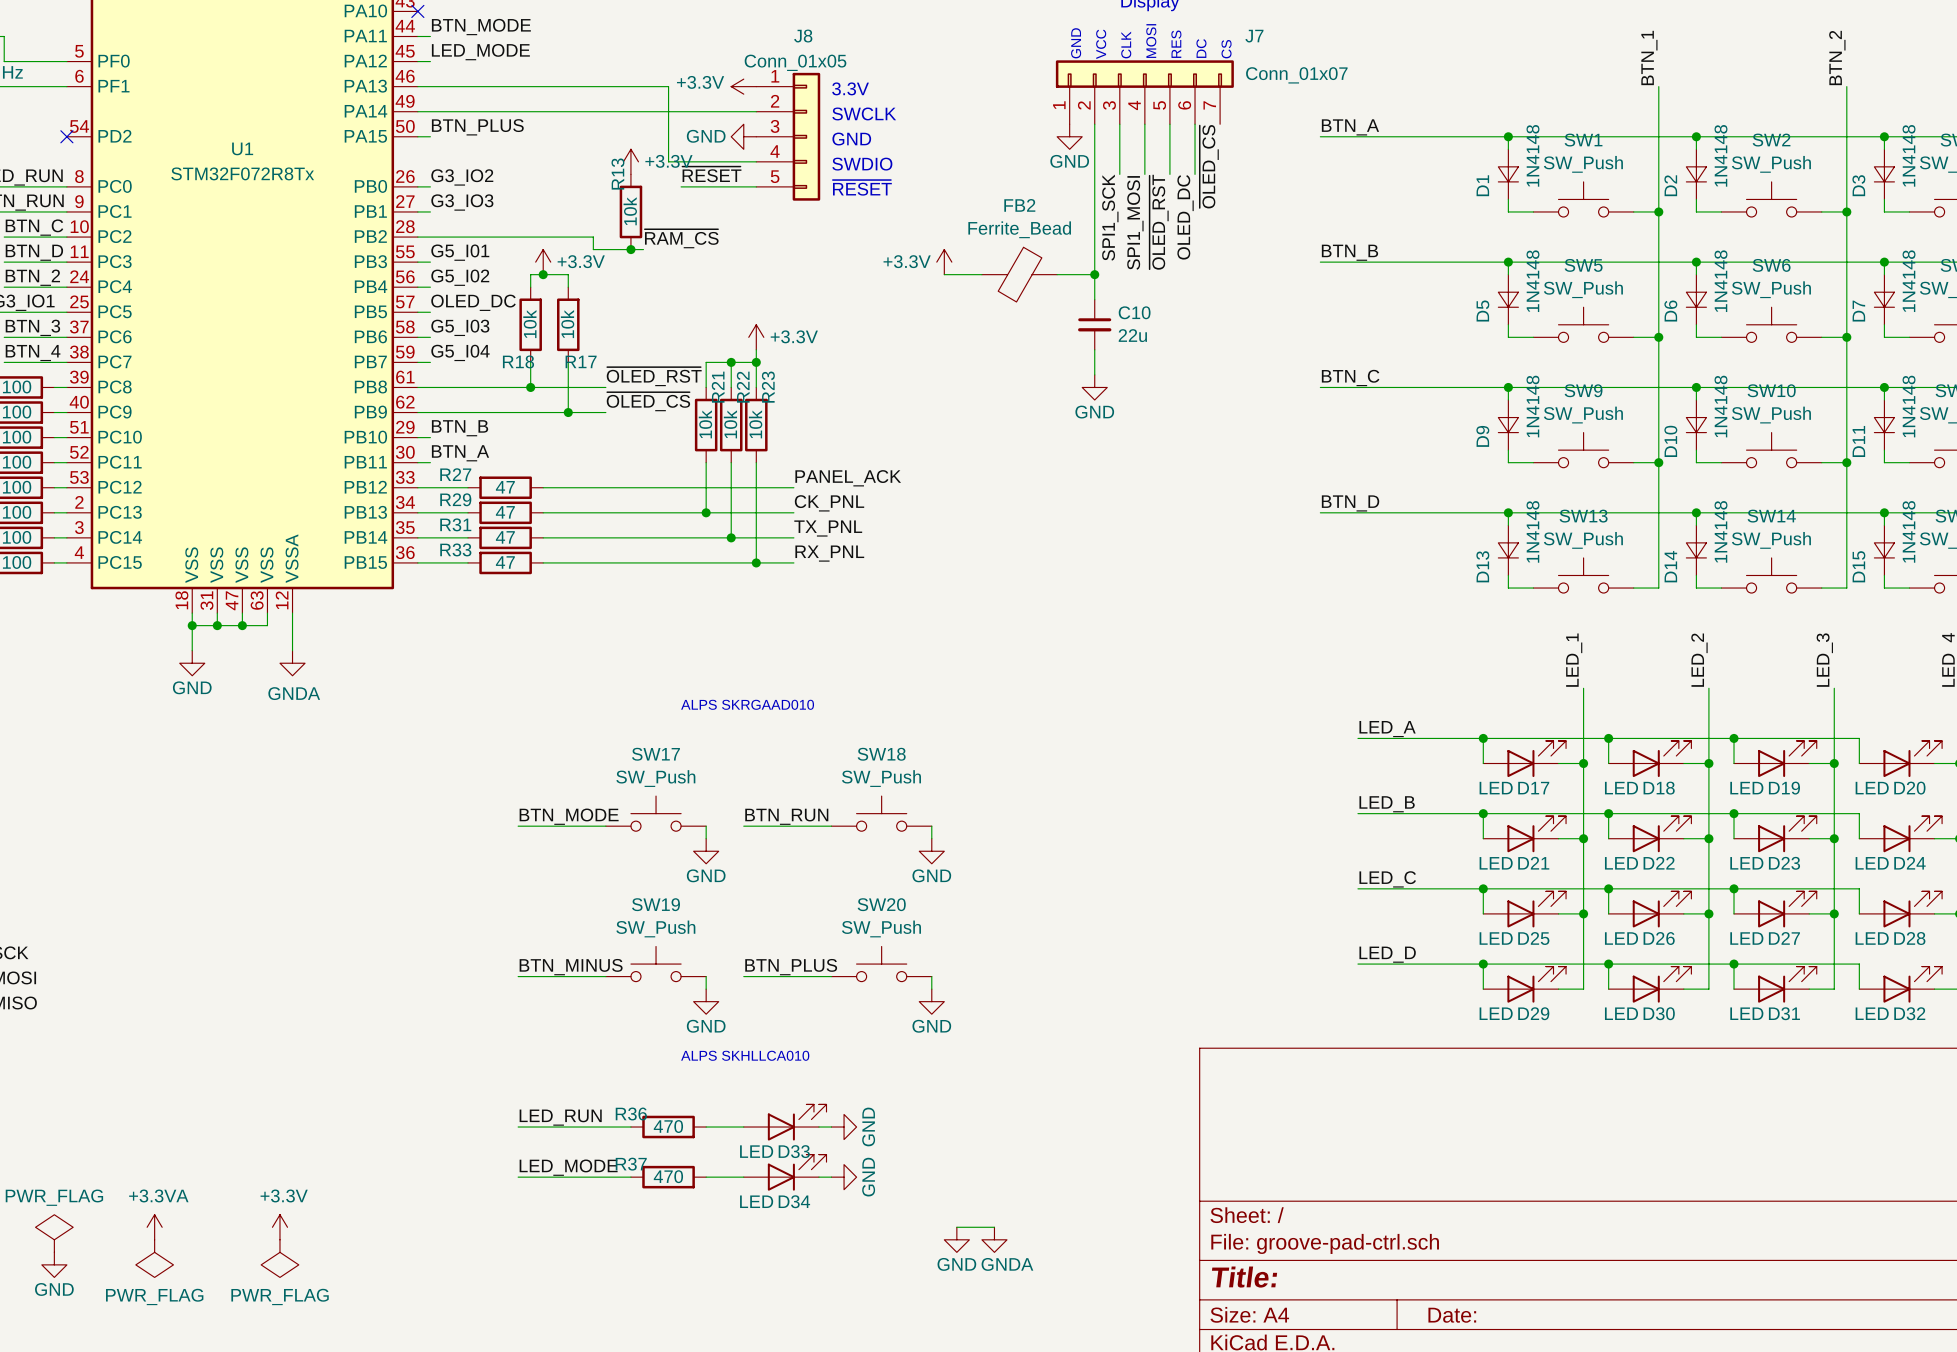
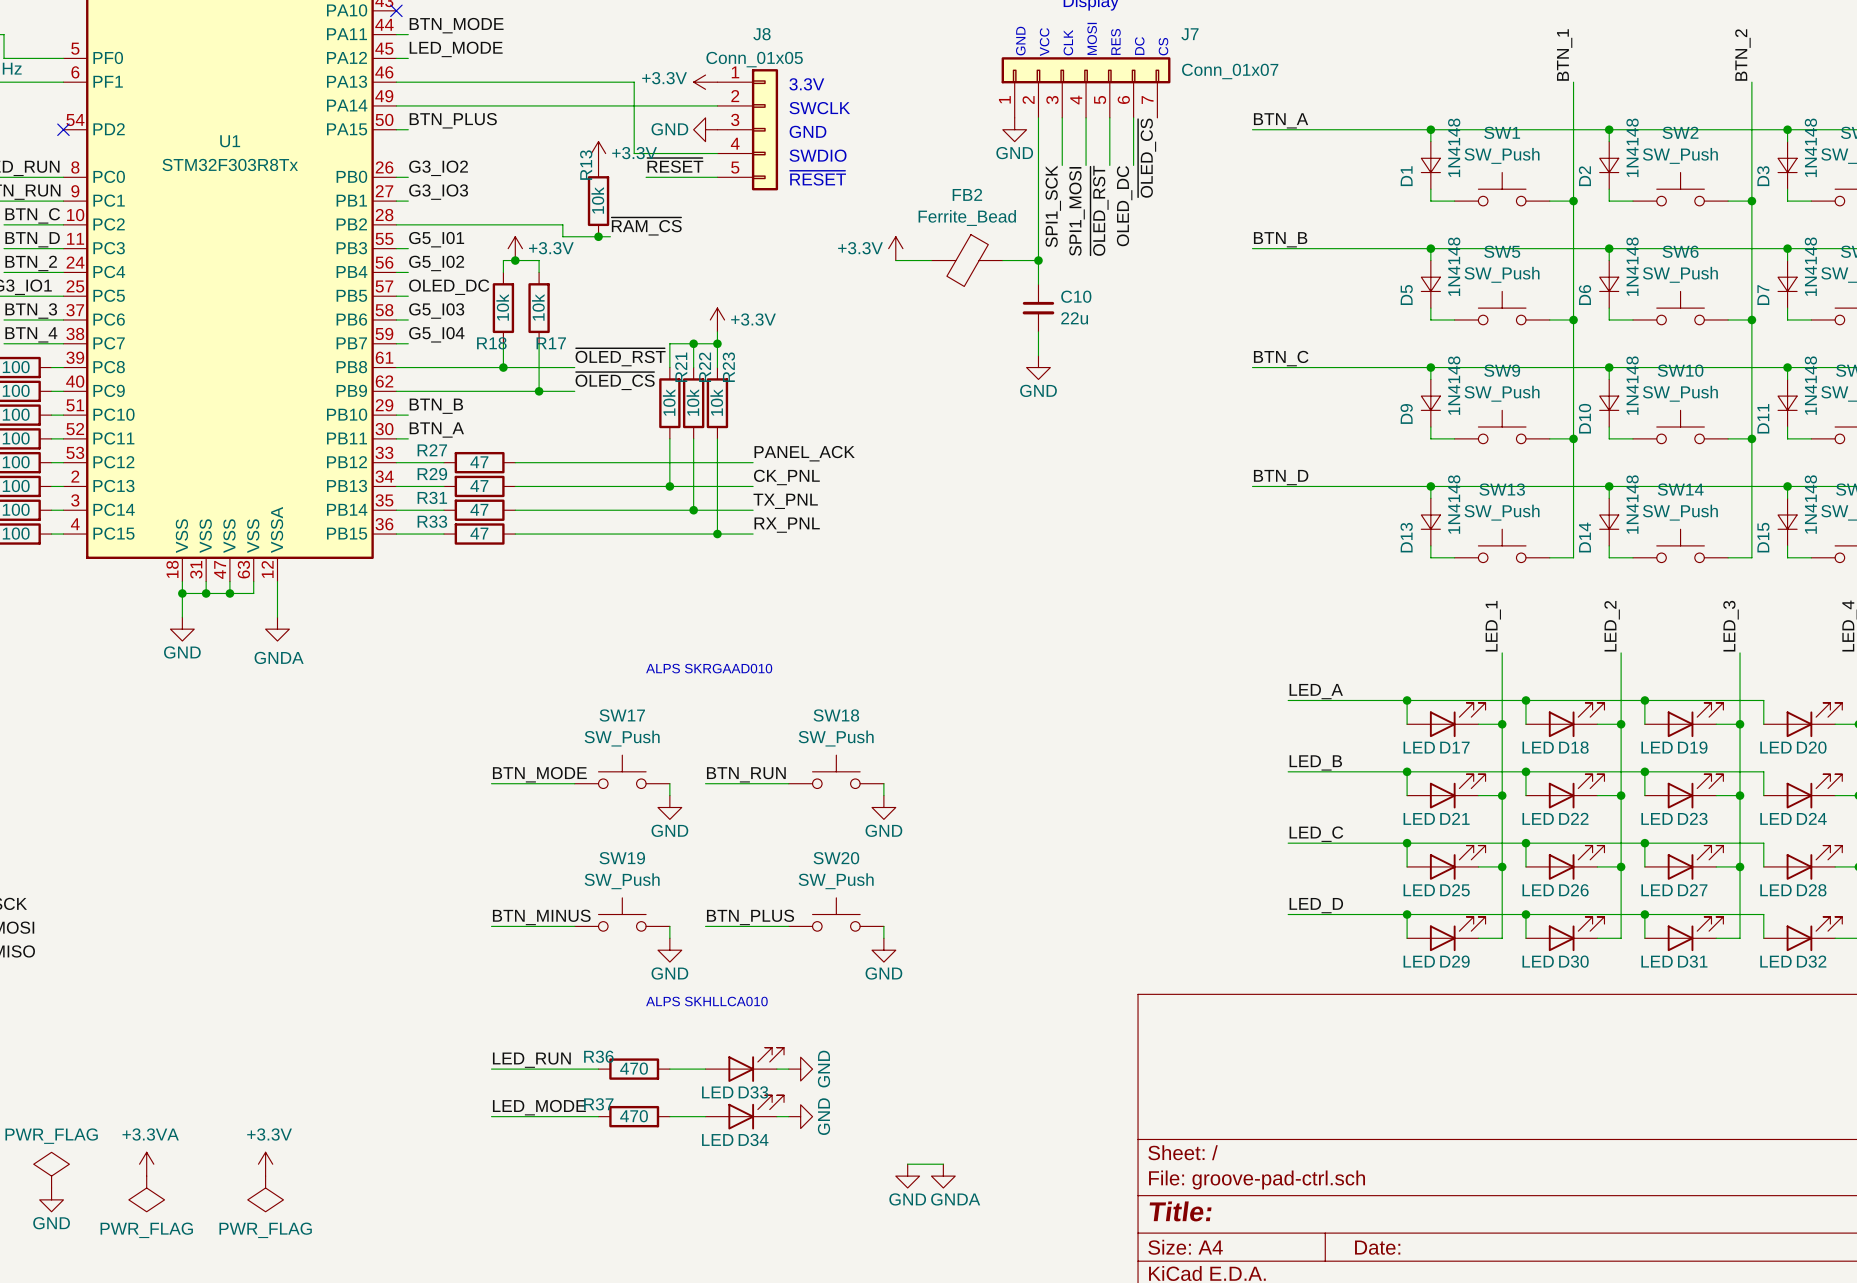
U1 value: STM32F072R8Tx (242, 173) -> STM32F303R8Tx (230, 164)

